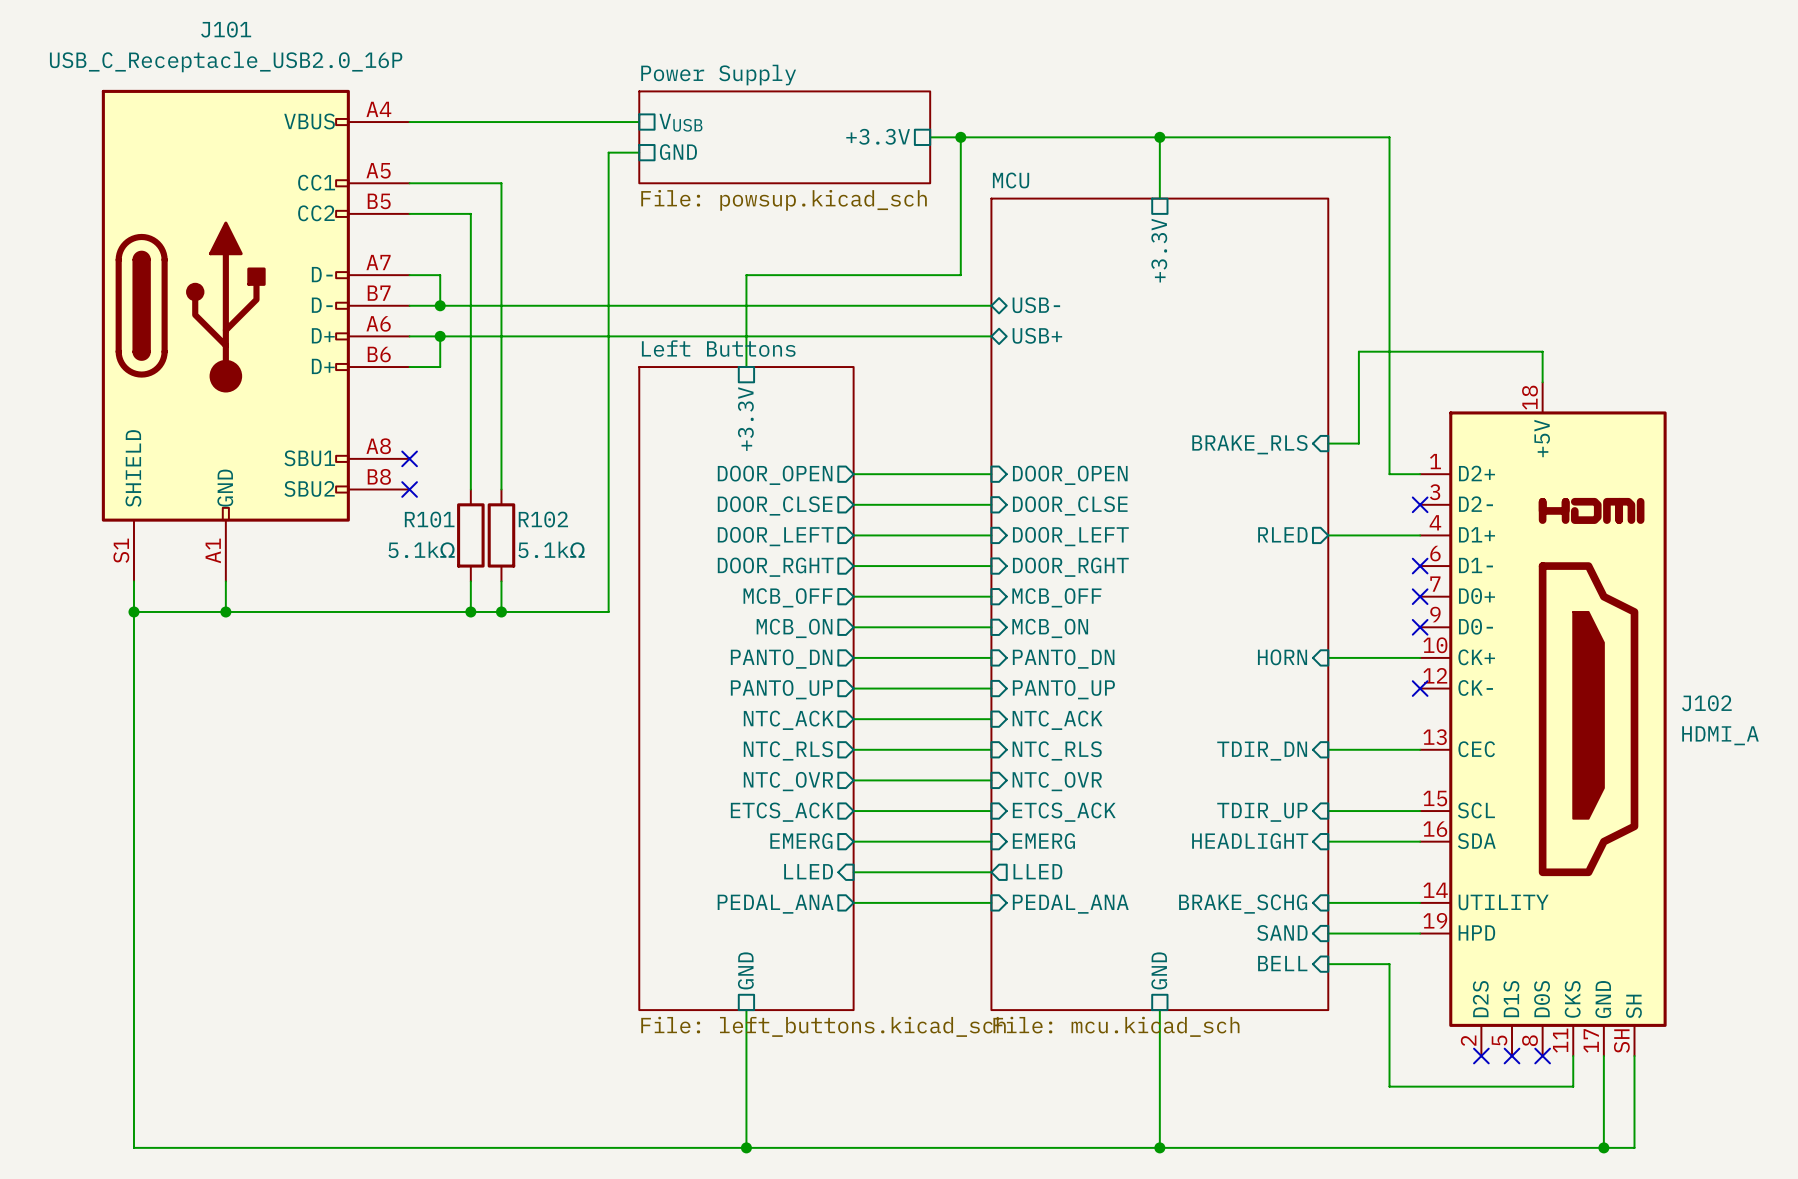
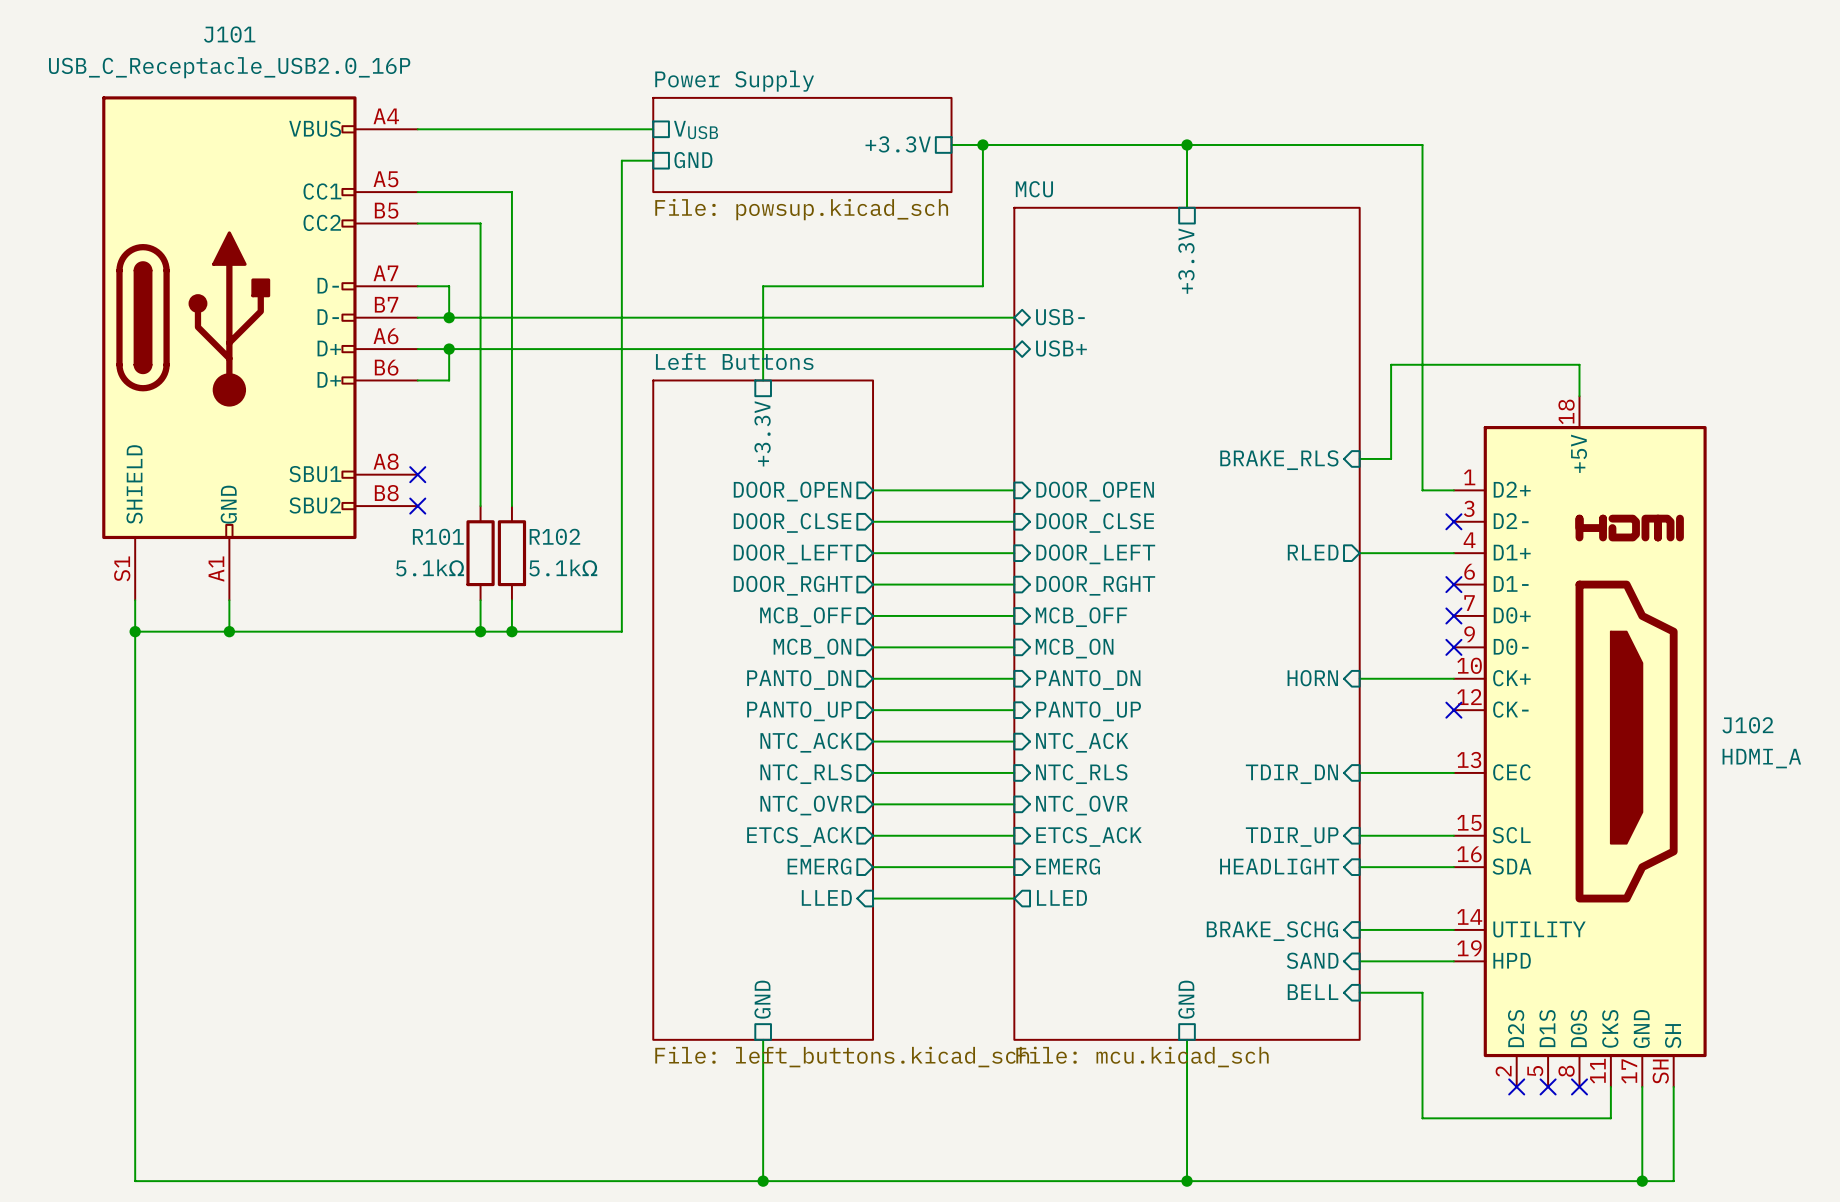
wire: (853, 902) (991, 902) -> none
sheet pin: PEDAL_ANA (775, 904) -> none
sheet pin: PEDAL_ANA (1070, 904) -> none

